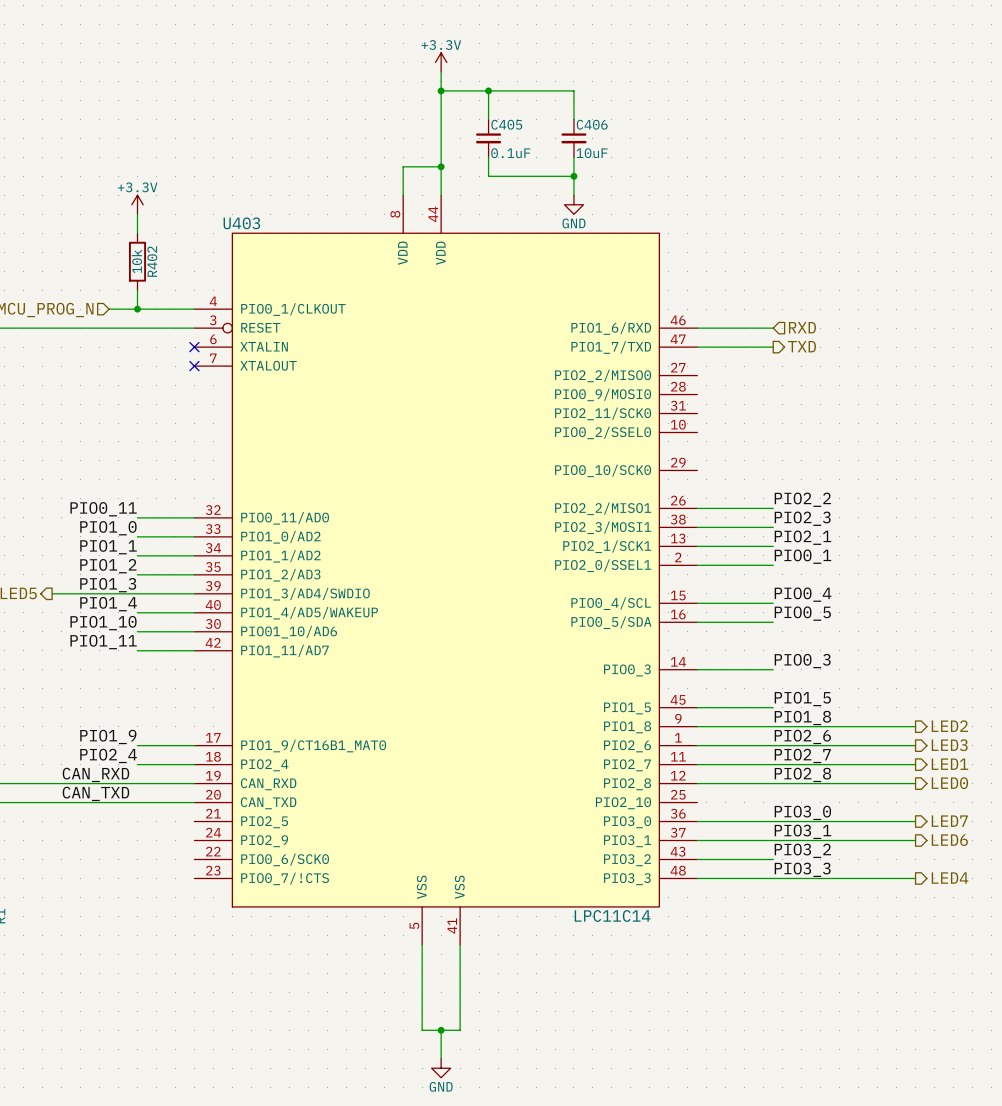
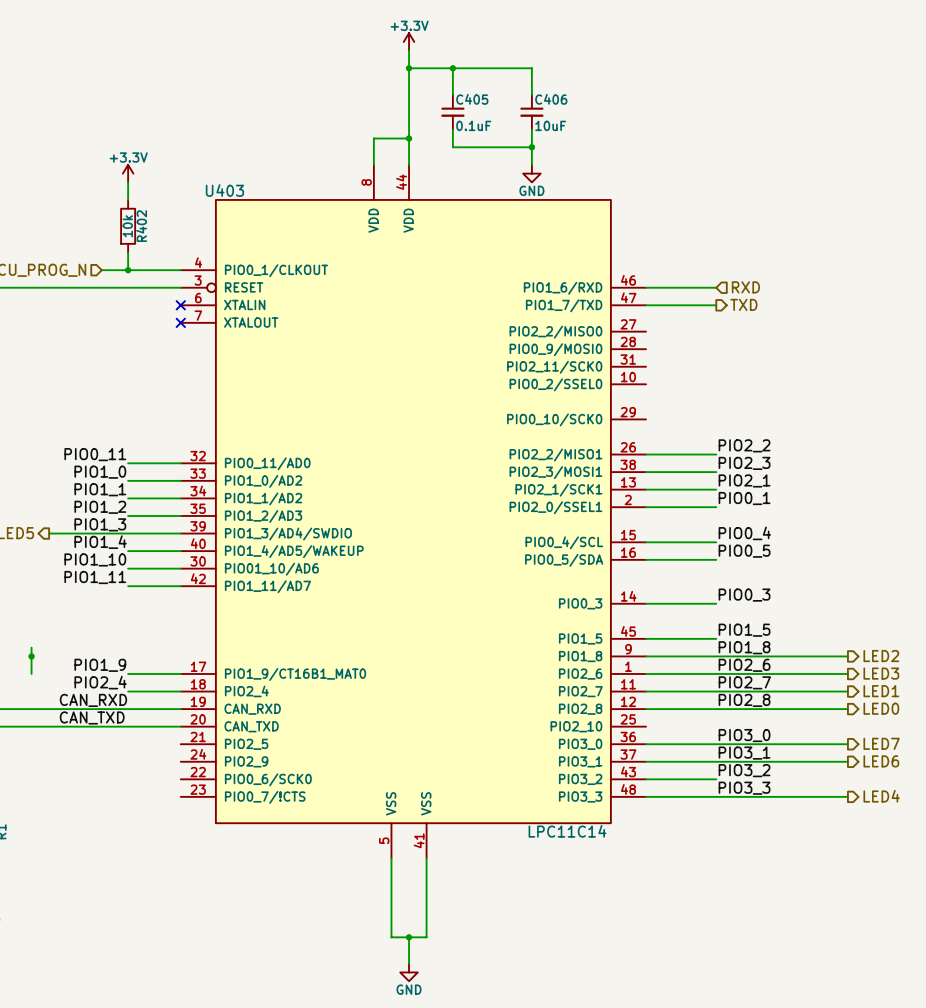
wire: none -> (31, 647) (31, 673)
junction: none -> (31, 656)

